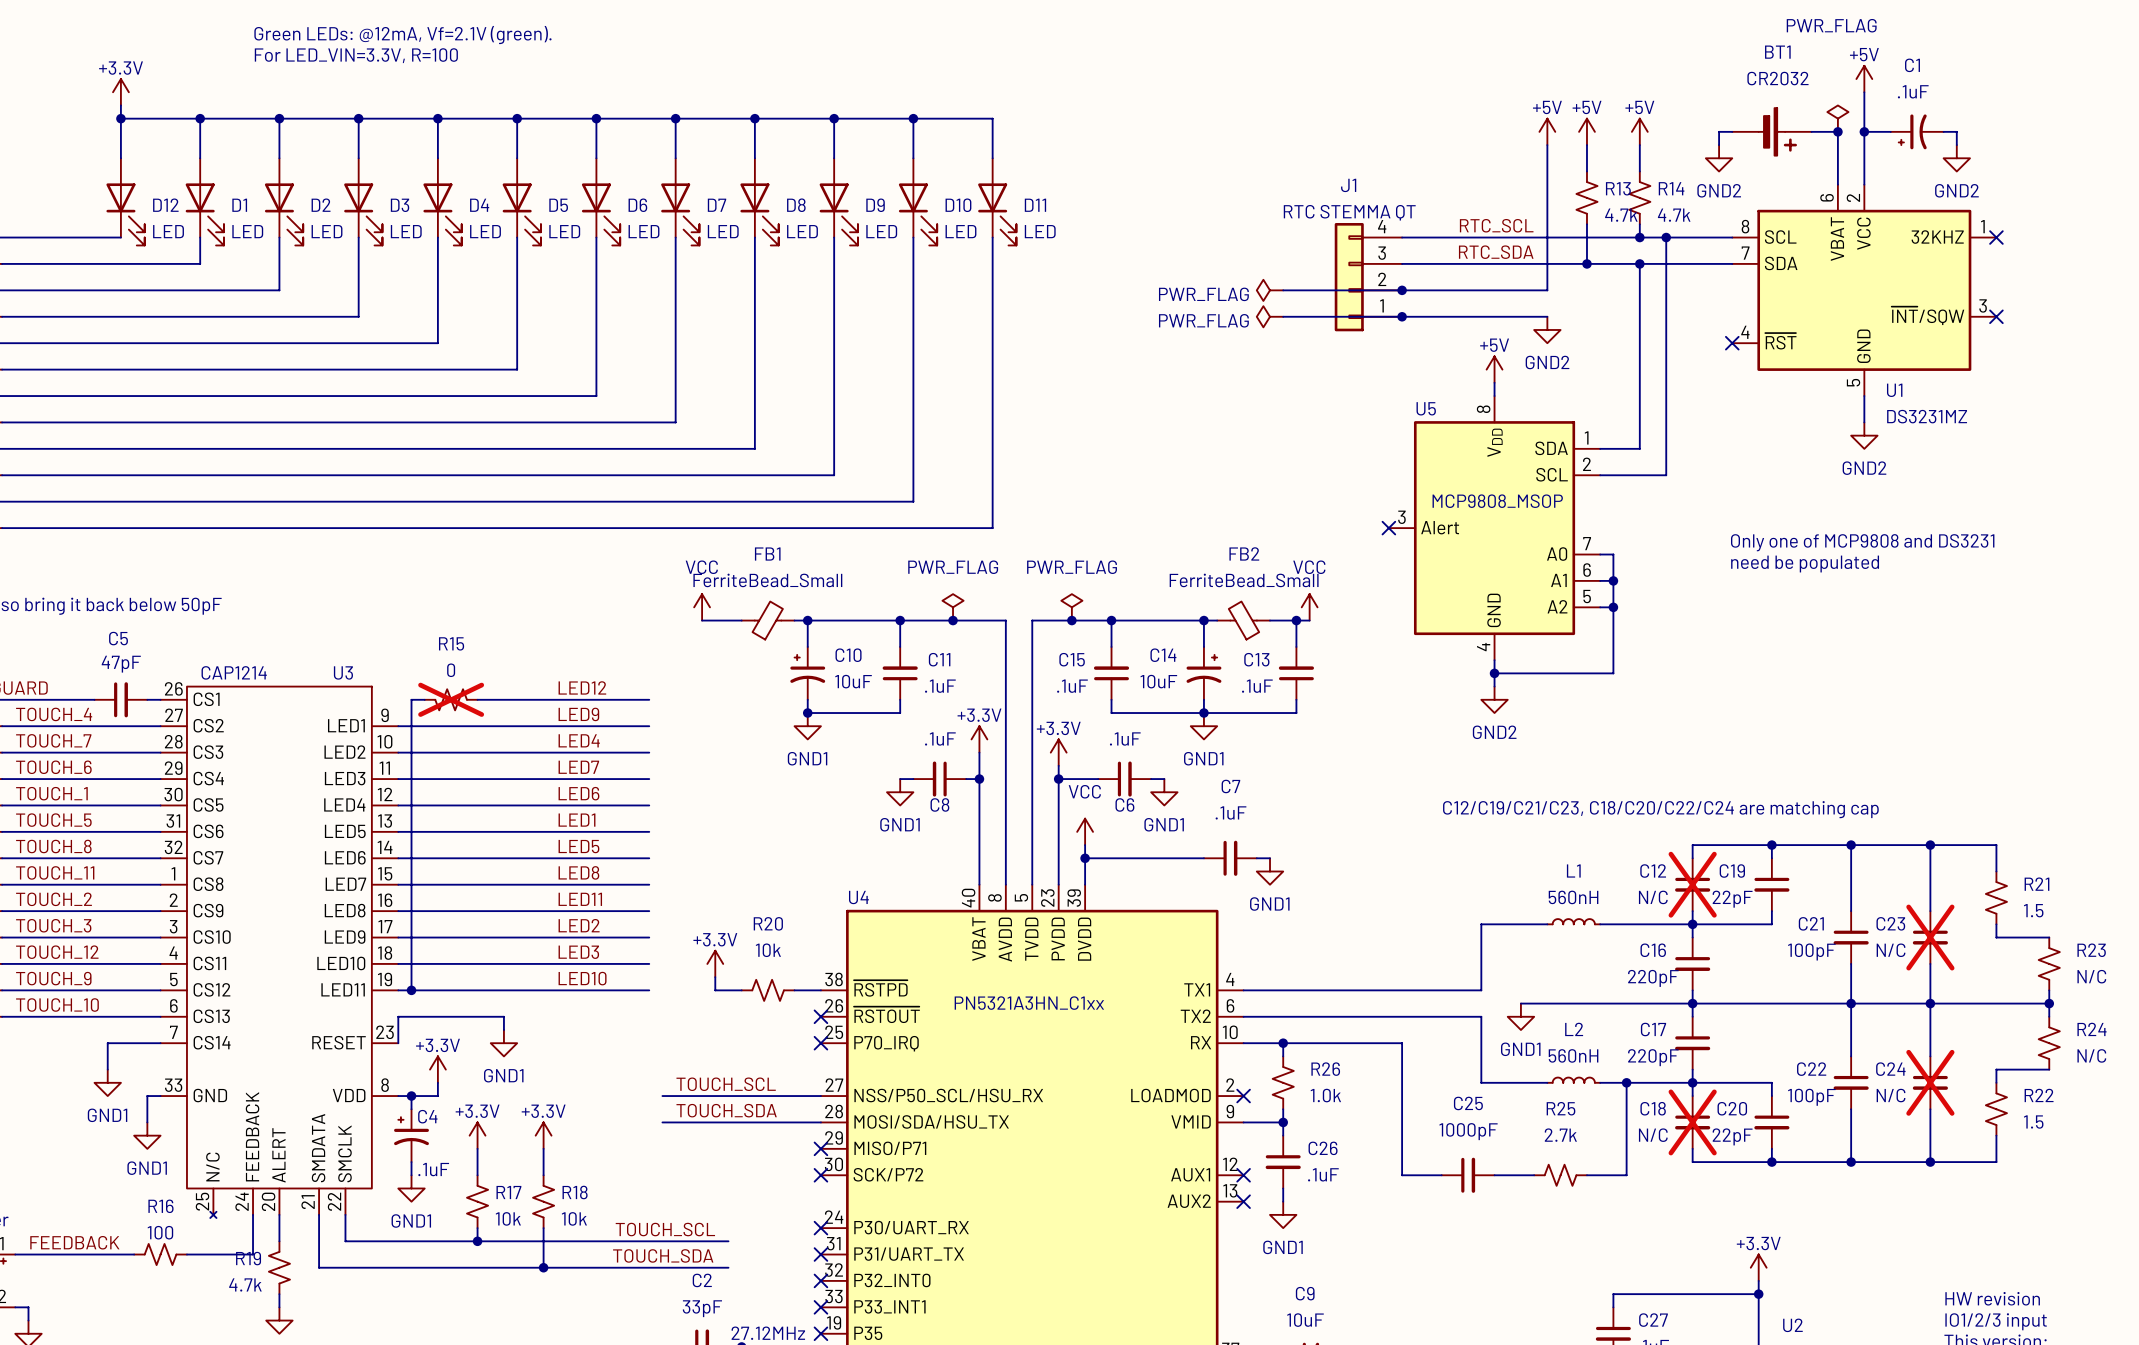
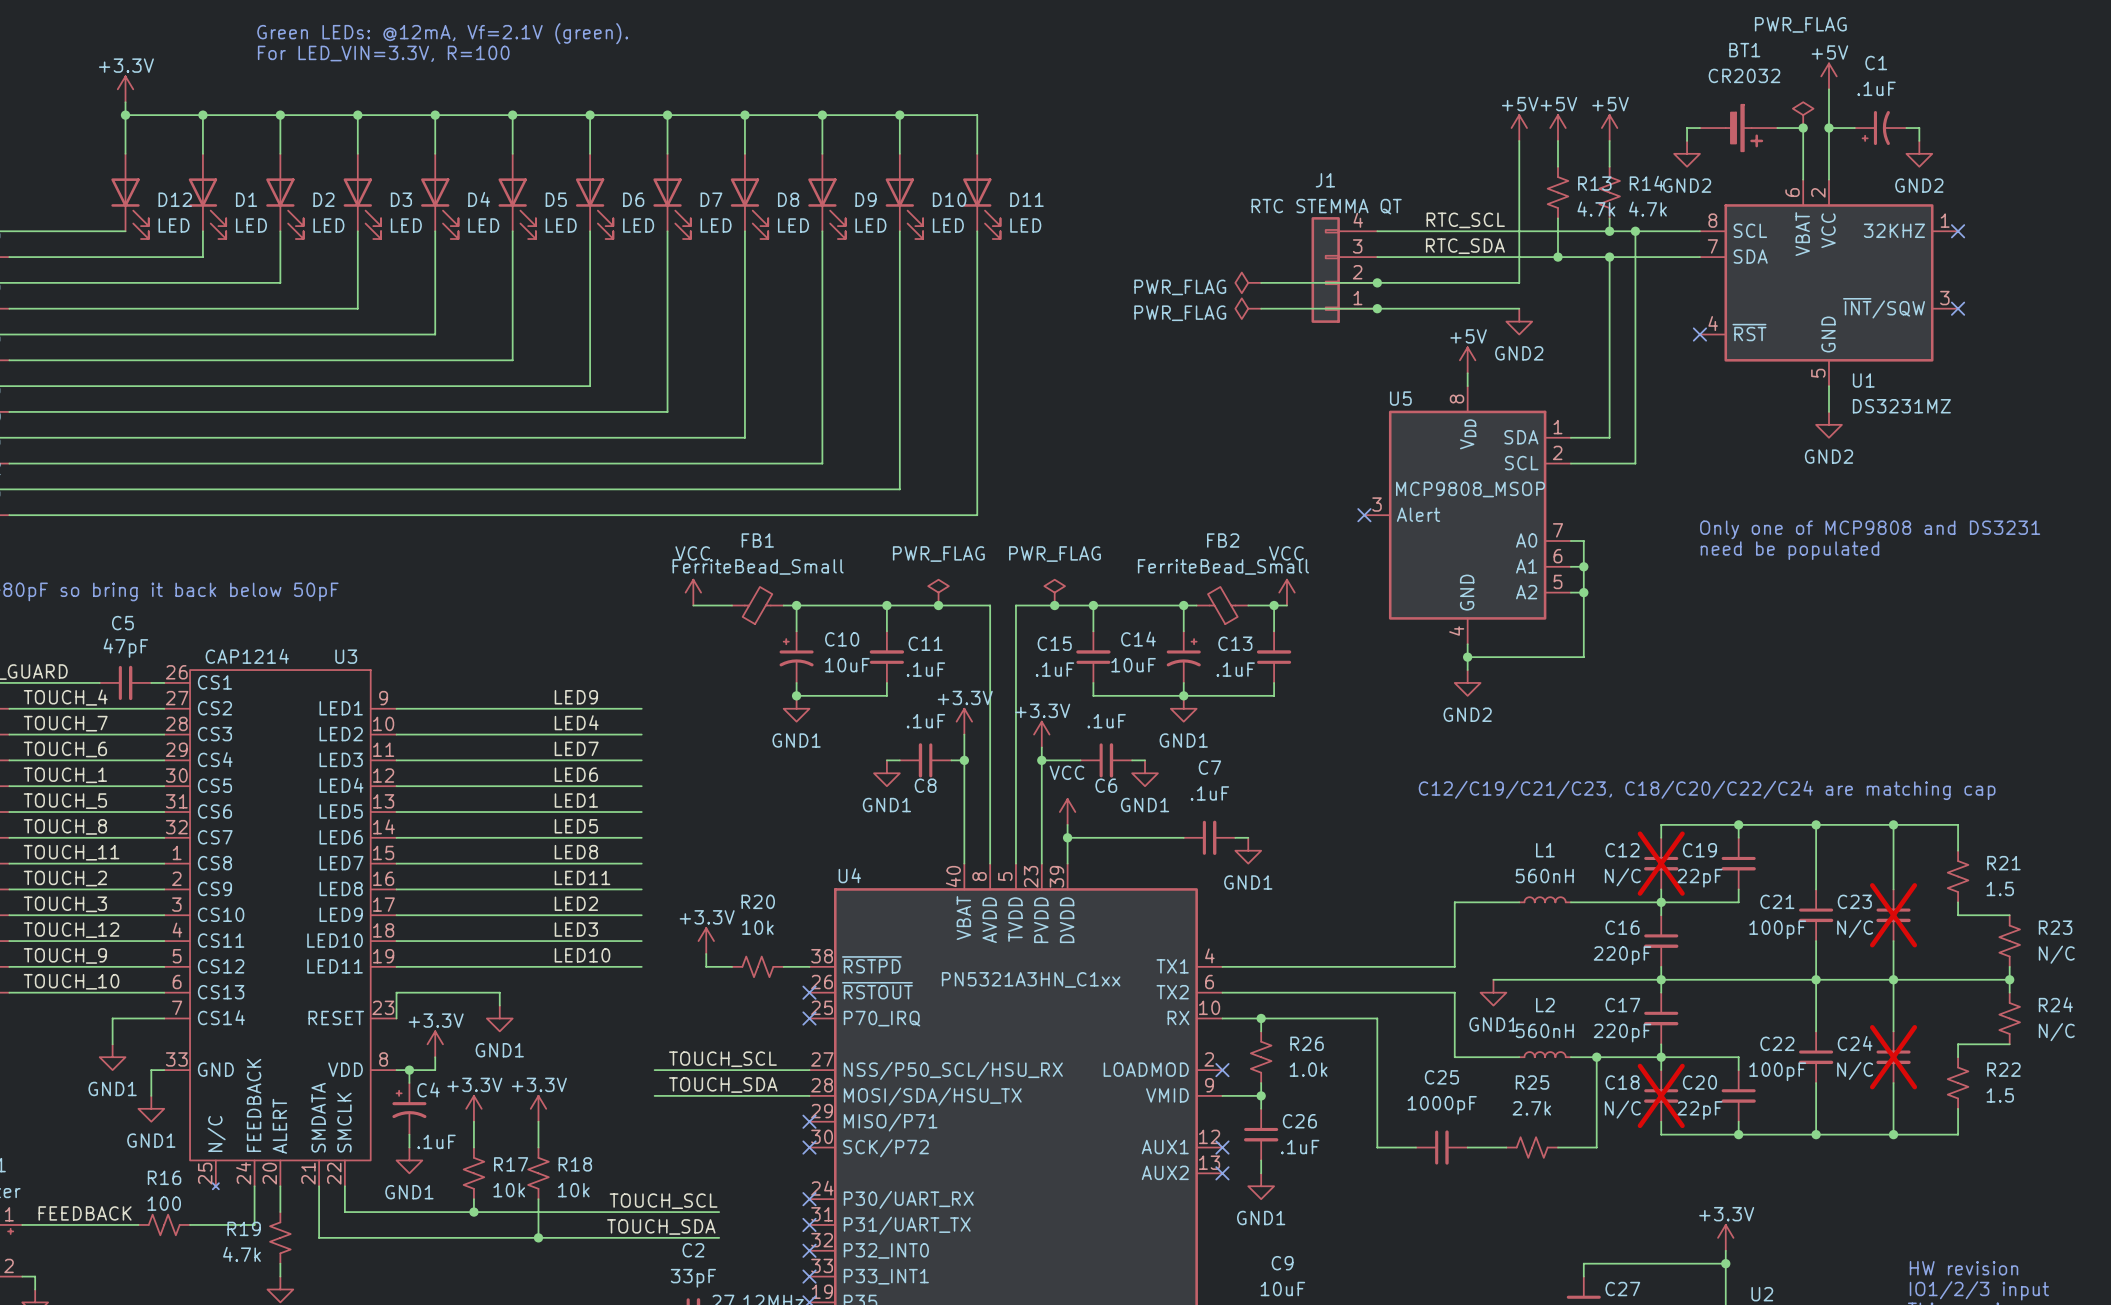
label: LED12 (582, 687) -> none
wire: (424, 699) (411, 699) (411, 990) -> none
R15: 0 (451, 699) -> none
wire: (477, 699) (649, 699) -> none
junction: (411, 990) -> none

